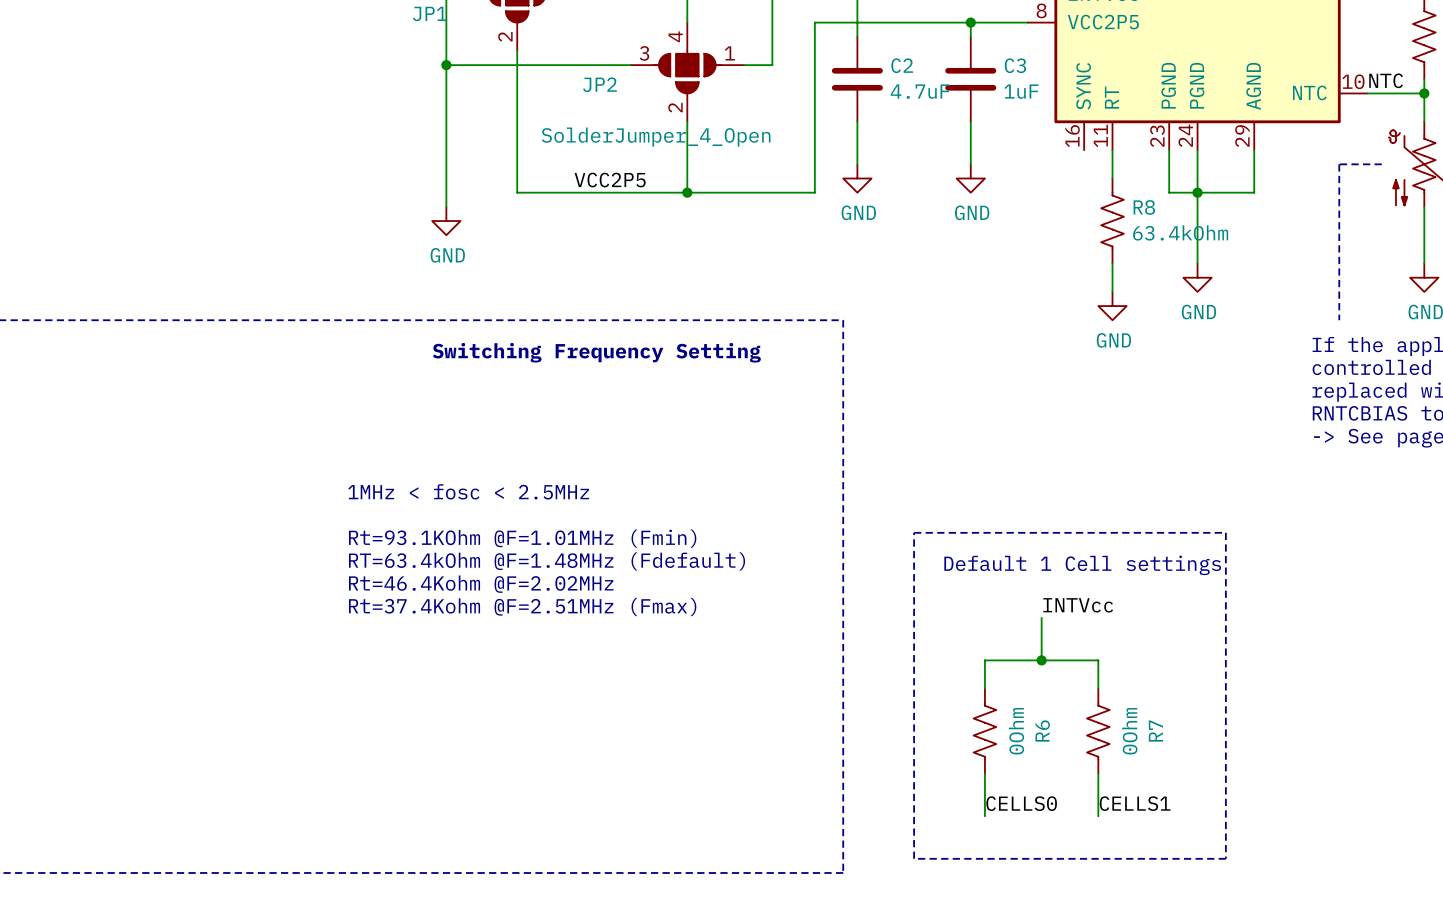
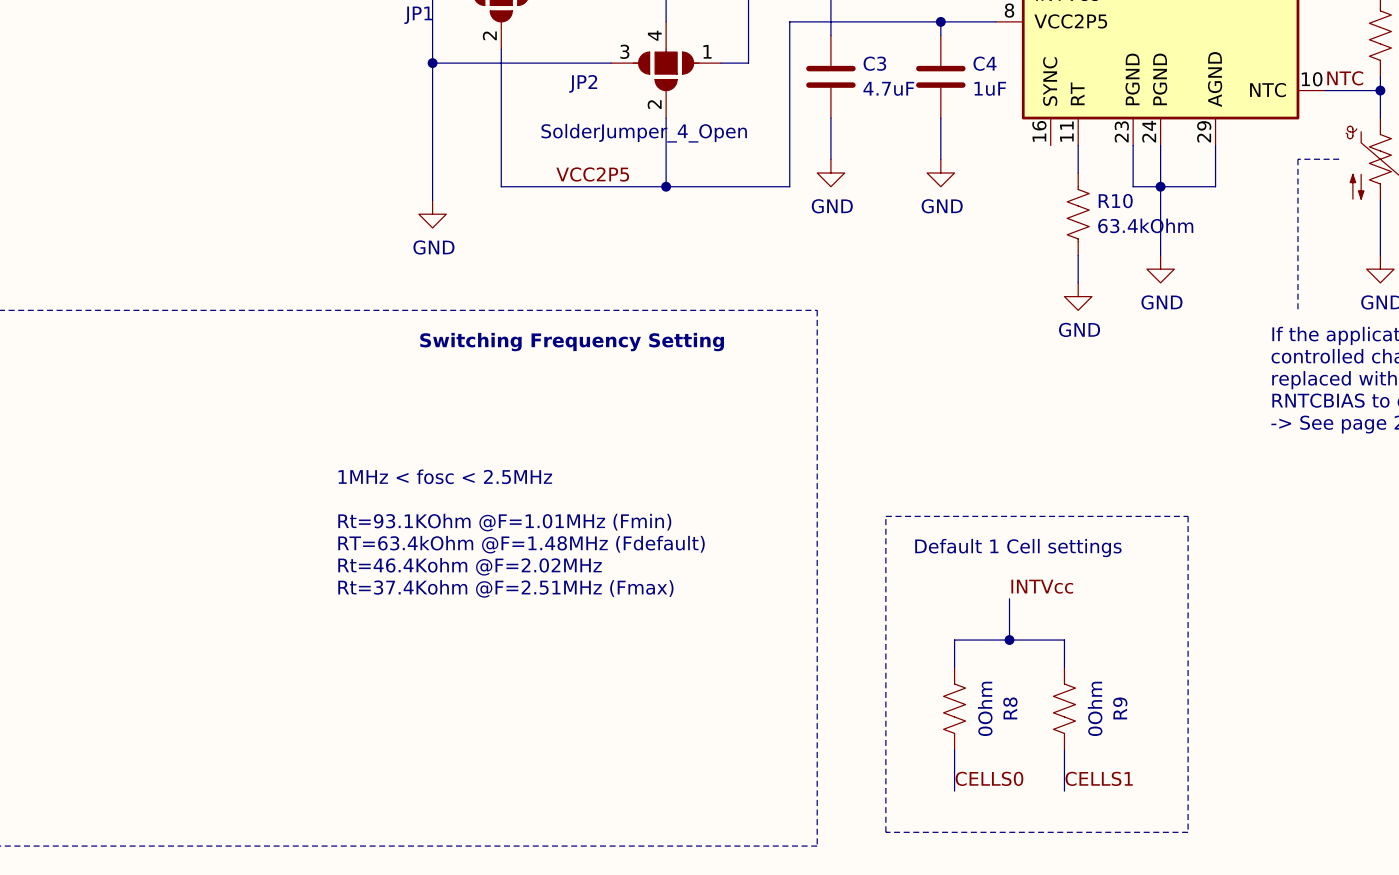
C2 name: C2 (902, 65) -> C3 (874, 63)
C3 name: C3 (1015, 65) -> C4 (984, 63)
R8 name: R8 (1144, 207) -> R10 (1115, 201)
R6 name: R6 (1042, 730) -> R8 (1010, 708)
R7 name: R7 (1155, 731) -> R9 (1120, 708)

